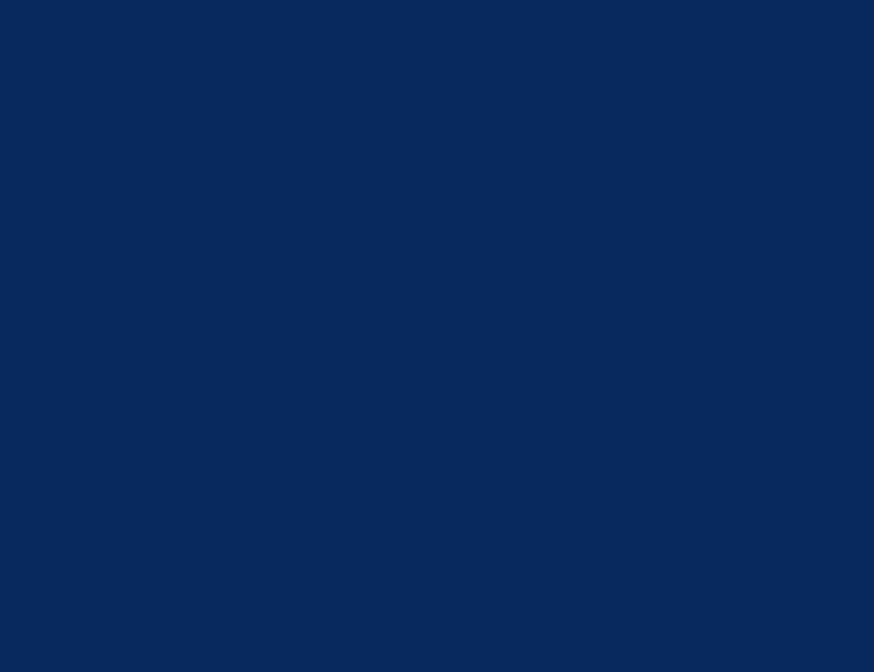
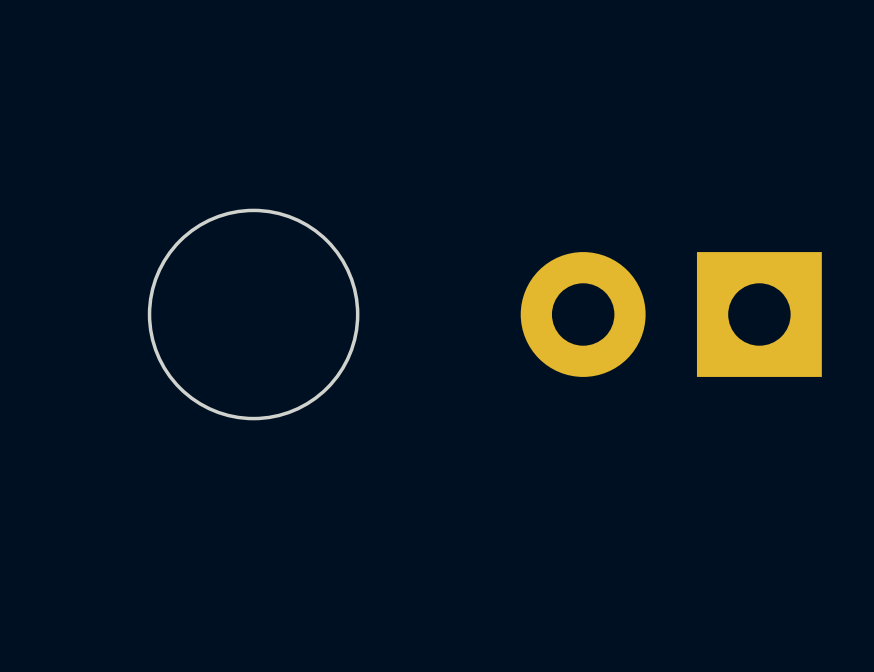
round board edge: none -> [147, 208, 360, 421]
part: none -> (671, 314)

